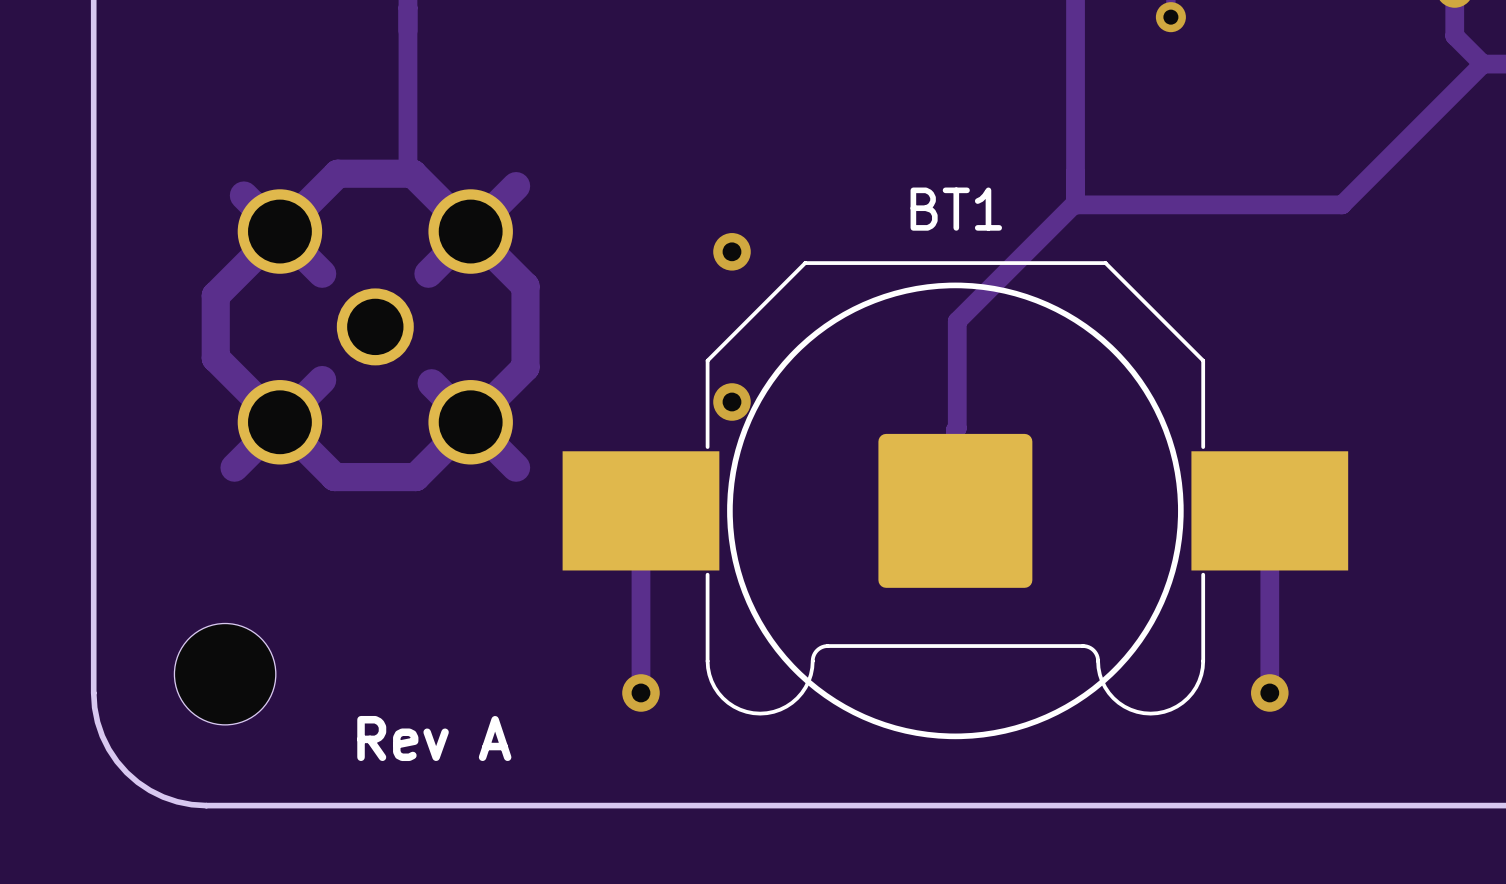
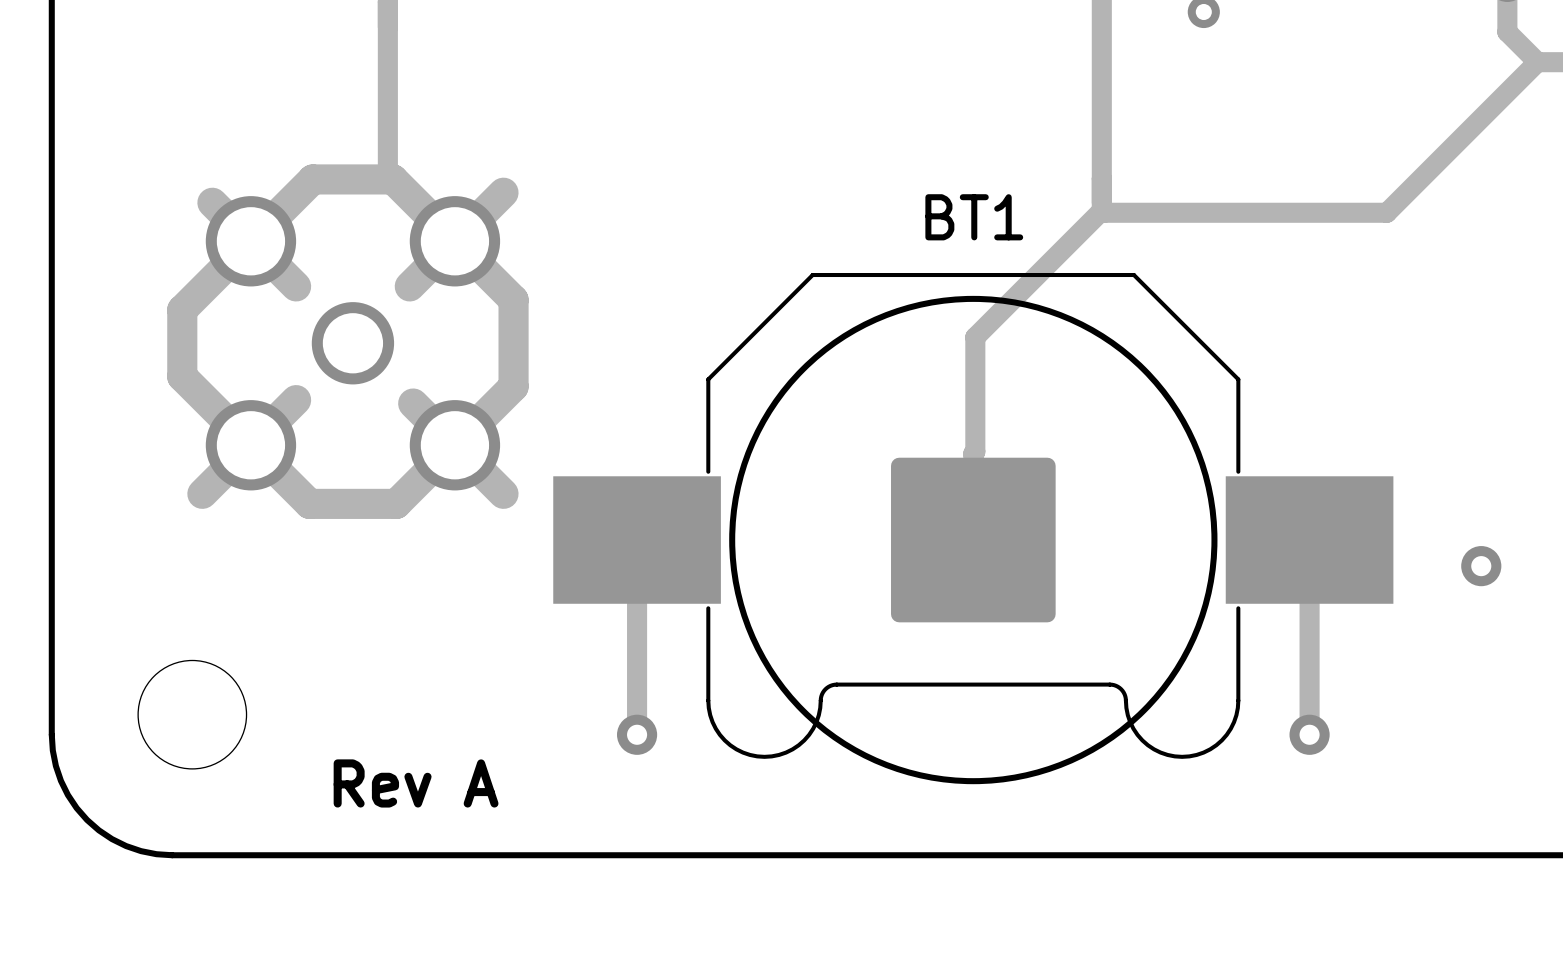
via: (731, 251) -> none
via: (731, 401) -> none
via: none -> (1481, 566)

